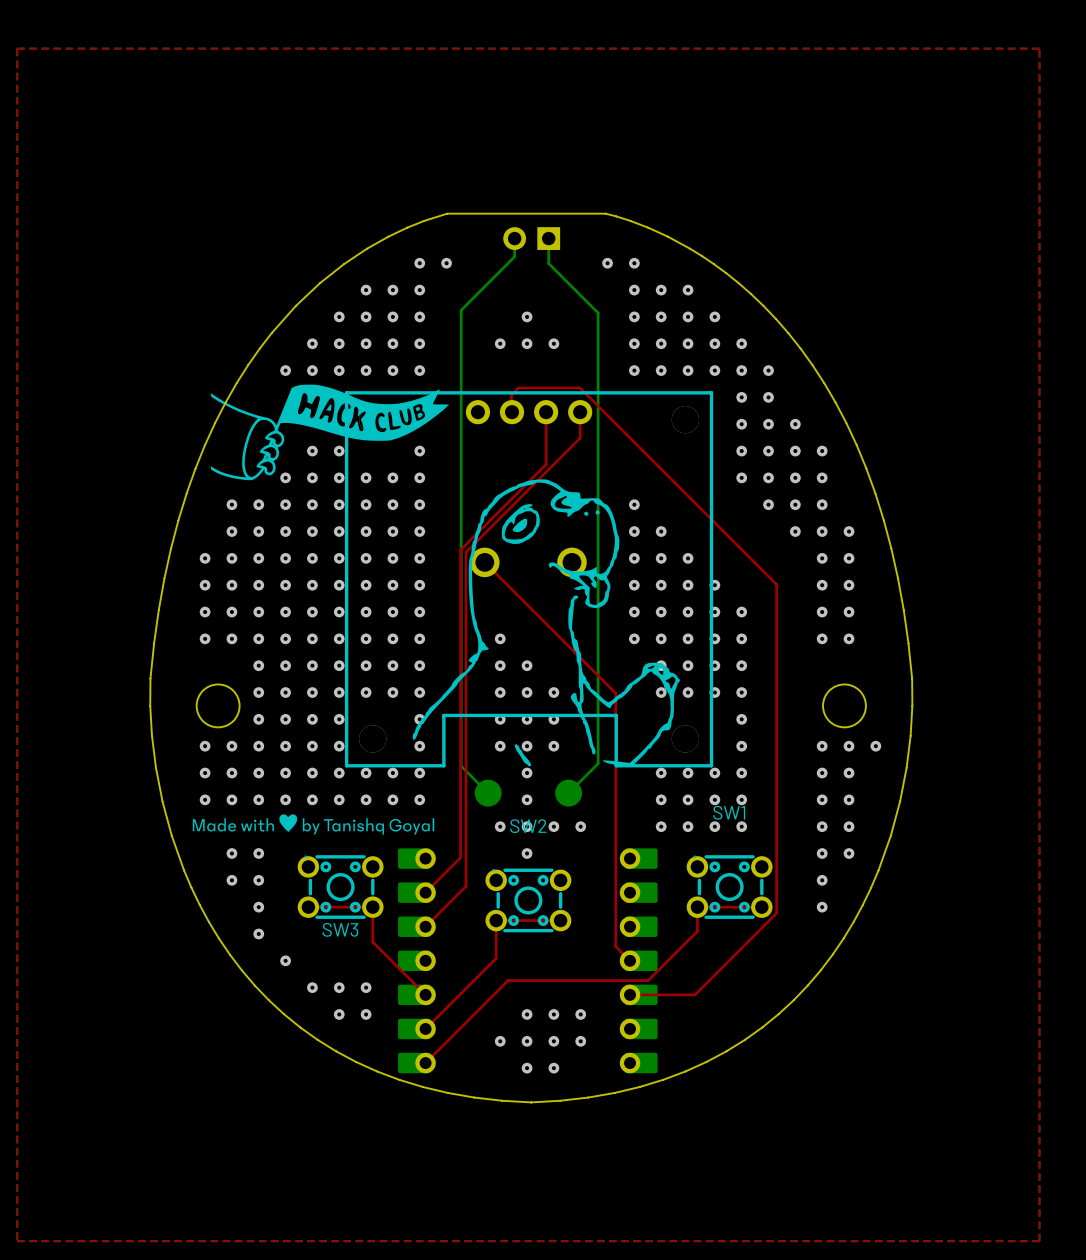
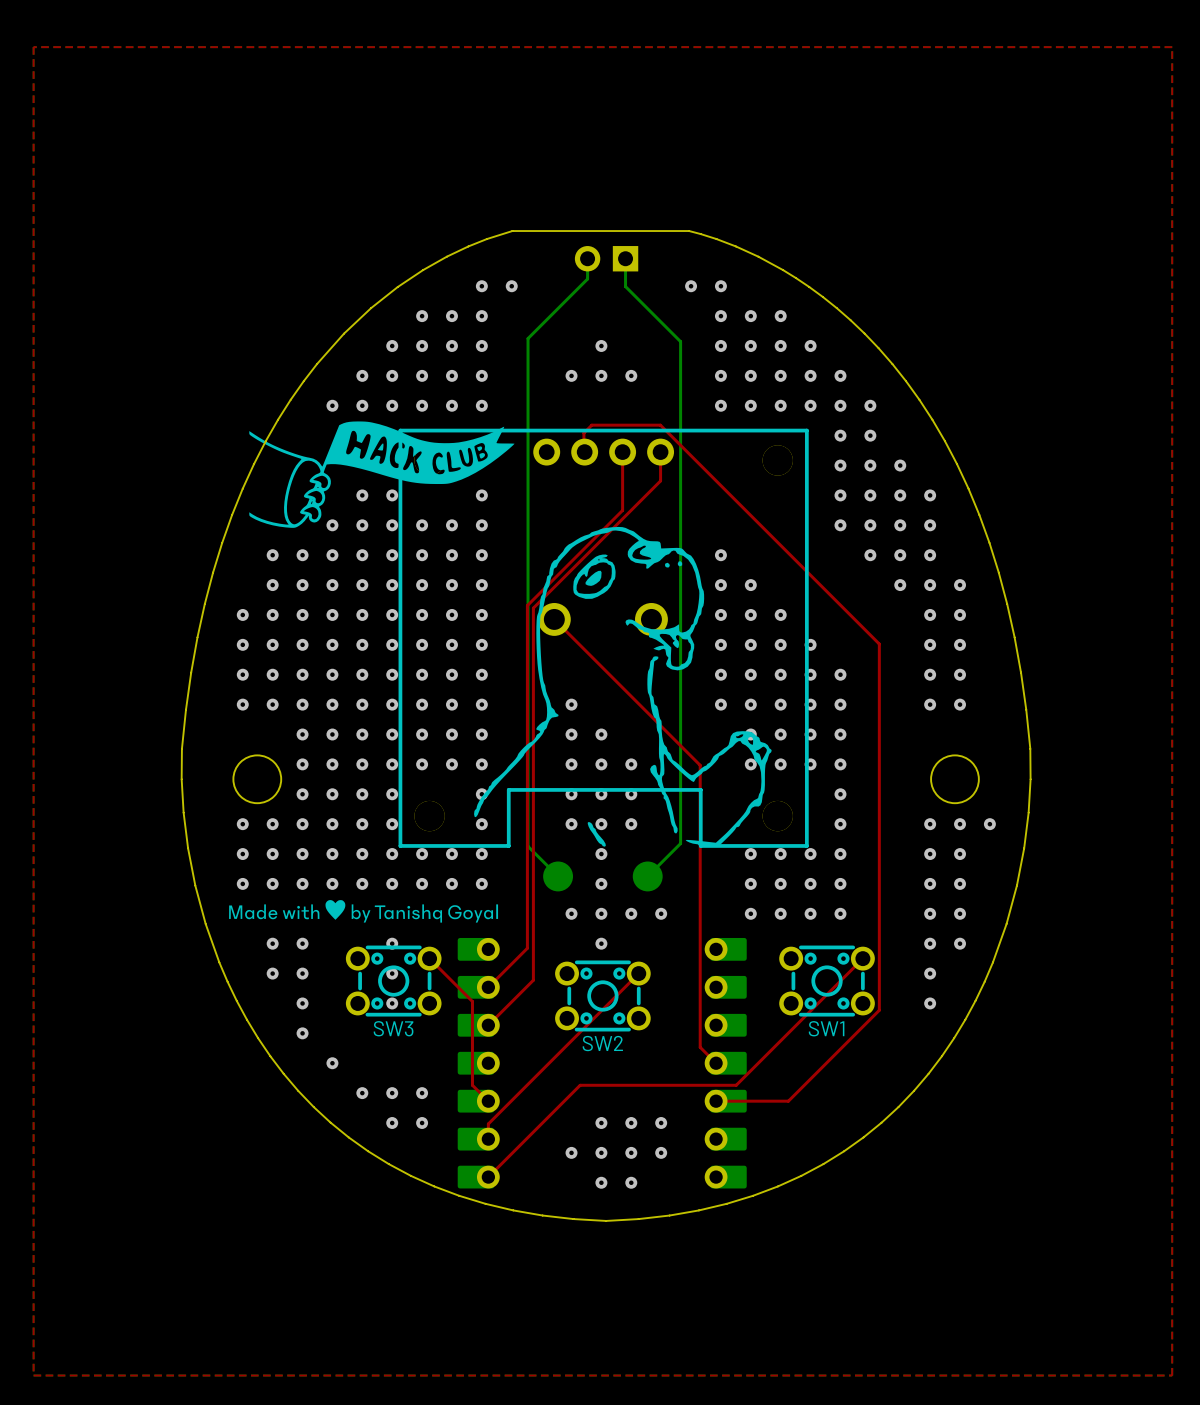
SW1 name position: SW1 (729, 812) -> SW1 (826, 1028)
SW2 name position: SW2 (528, 826) -> SW2 (602, 1043)
via: none -> (392, 943)
SW3 footprint: [297, 855, 384, 919] -> [345, 945, 442, 1017]
SW1 footprint: [686, 855, 773, 919] -> [779, 945, 875, 1017]
SW2 footprint: [485, 868, 572, 933] -> [555, 960, 651, 1032]
via: none -> (392, 973)
top track: (308, 907) (372, 907) (372, 942) (411, 980) -> (429, 958) (472, 1001) (472, 1085)
via: none -> (392, 1003)
top track: (761, 907) (697, 907) (697, 931) -> (862, 958) (791, 1030)
top track: (560, 920) (496, 920) (496, 958) (425, 1028) -> (638, 973) (488, 1123) (488, 1139)

